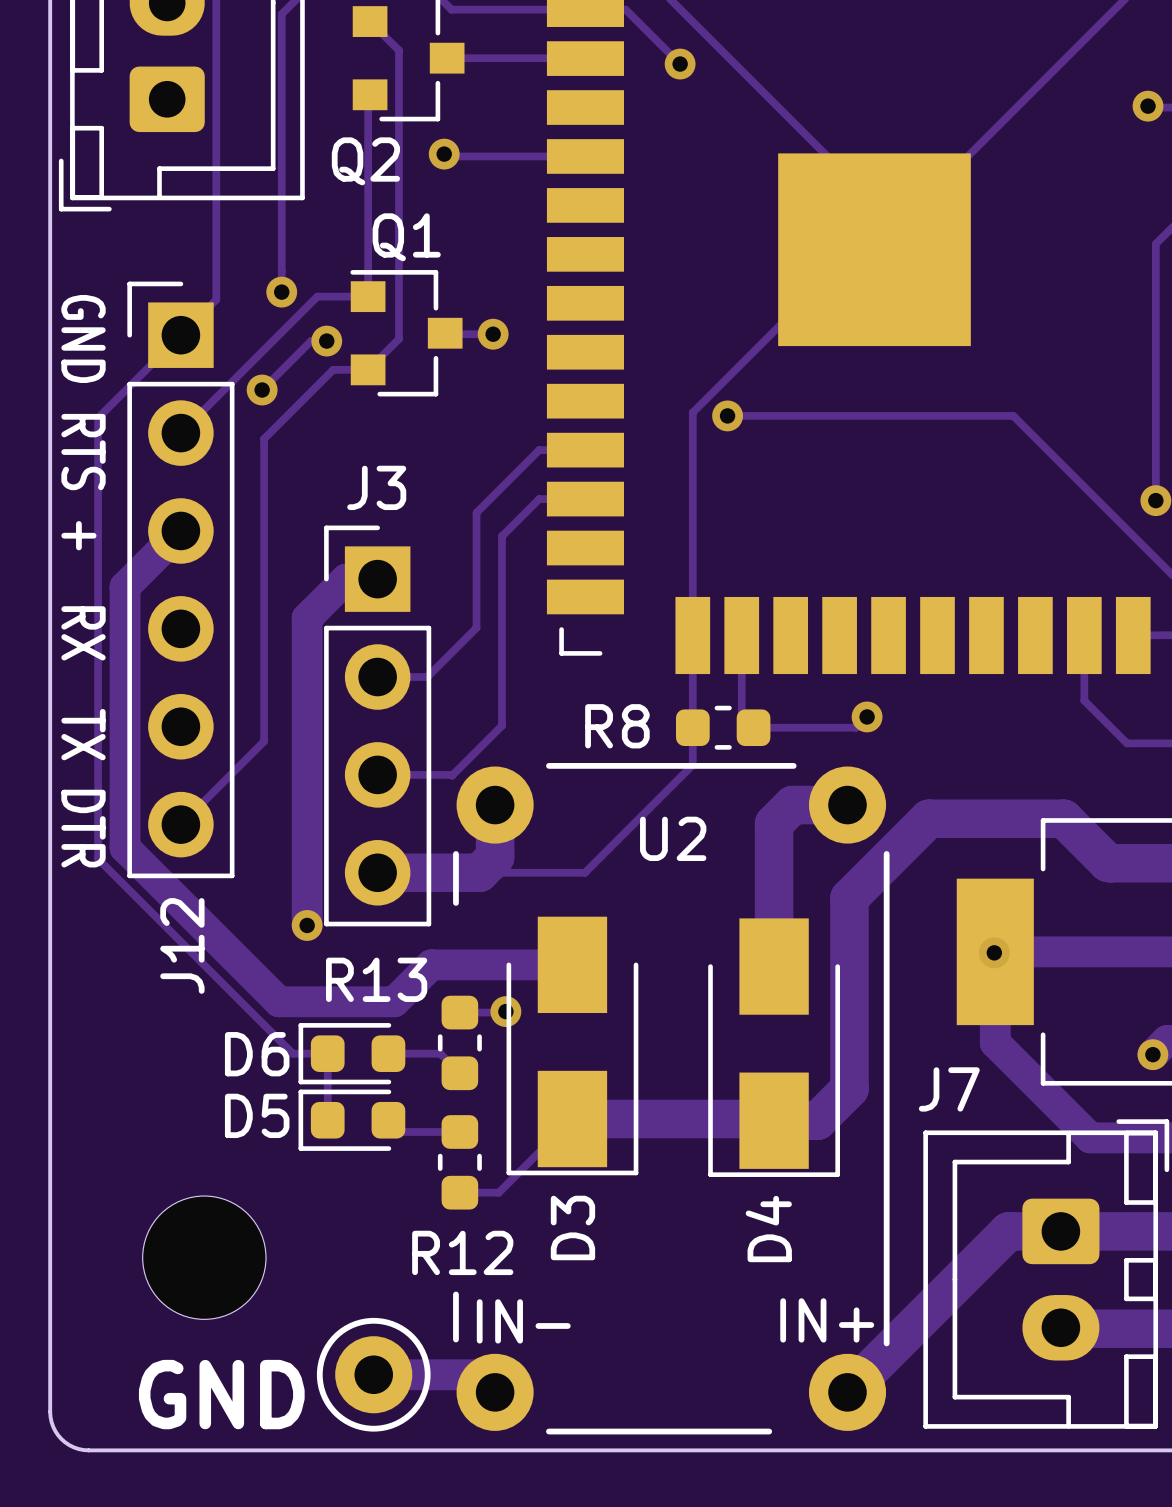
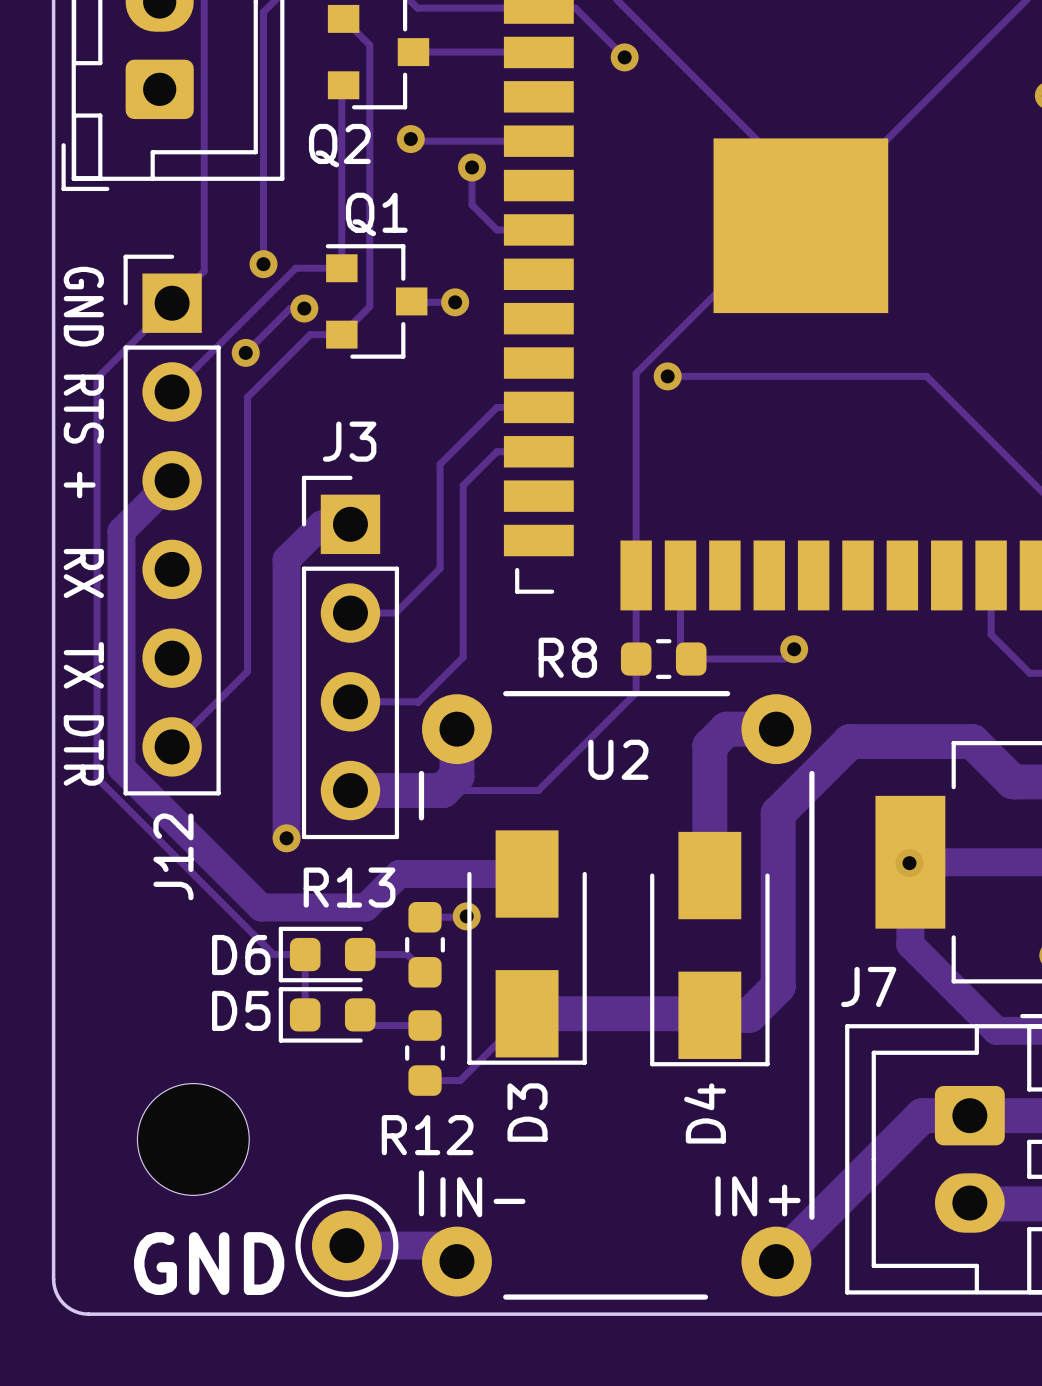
track: none -> (472, 167) (472, 205) (496, 229) (538, 229)
via: none -> (472, 167)

